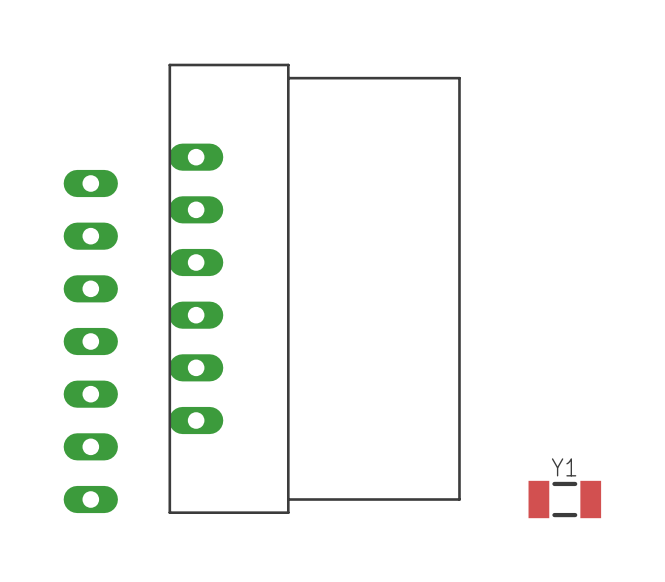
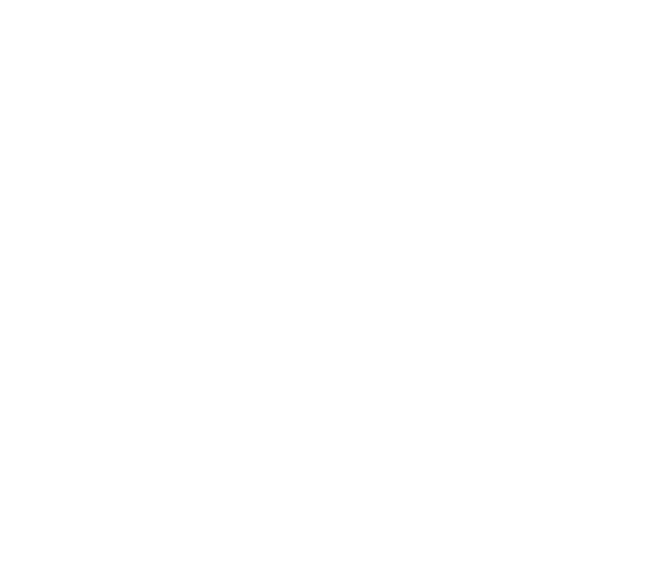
part: (314, 288) -> none
part: (90, 341) -> none
Y1: (564, 499) -> none

